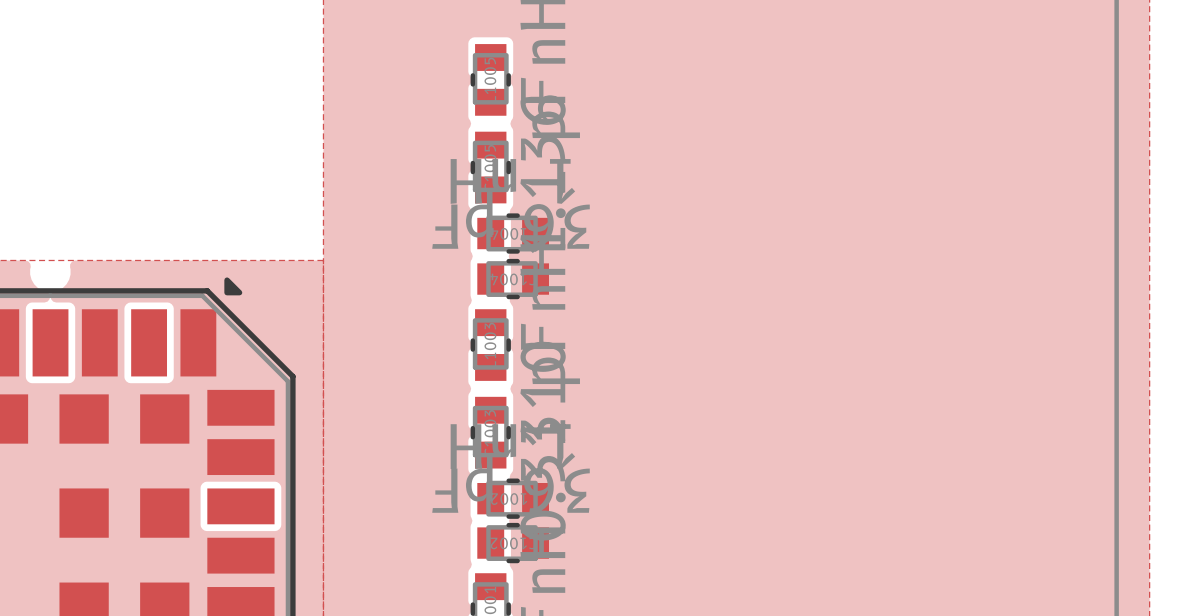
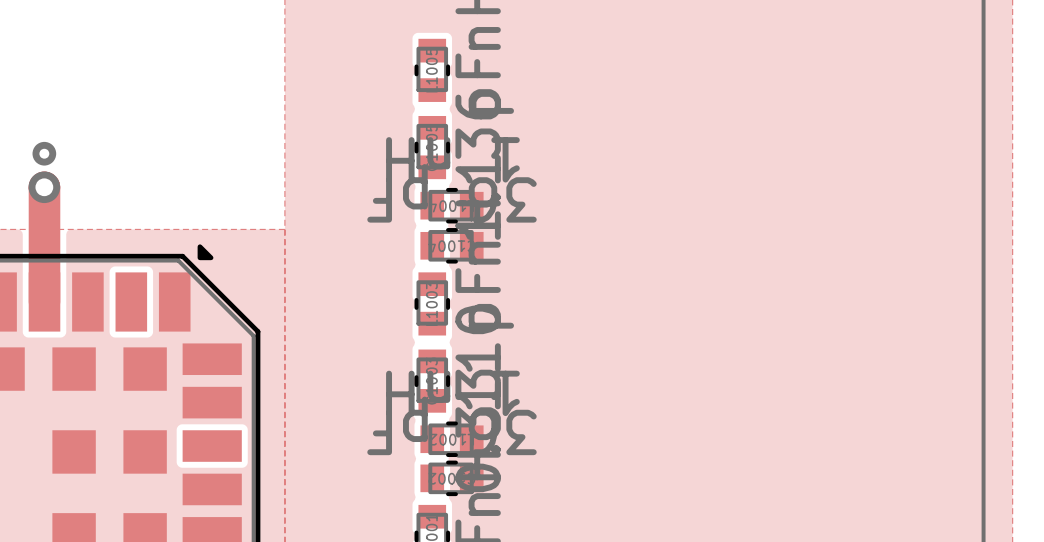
via: none -> (44, 153)
track: none -> (44, 187) (44, 301)
via: none -> (44, 187)

